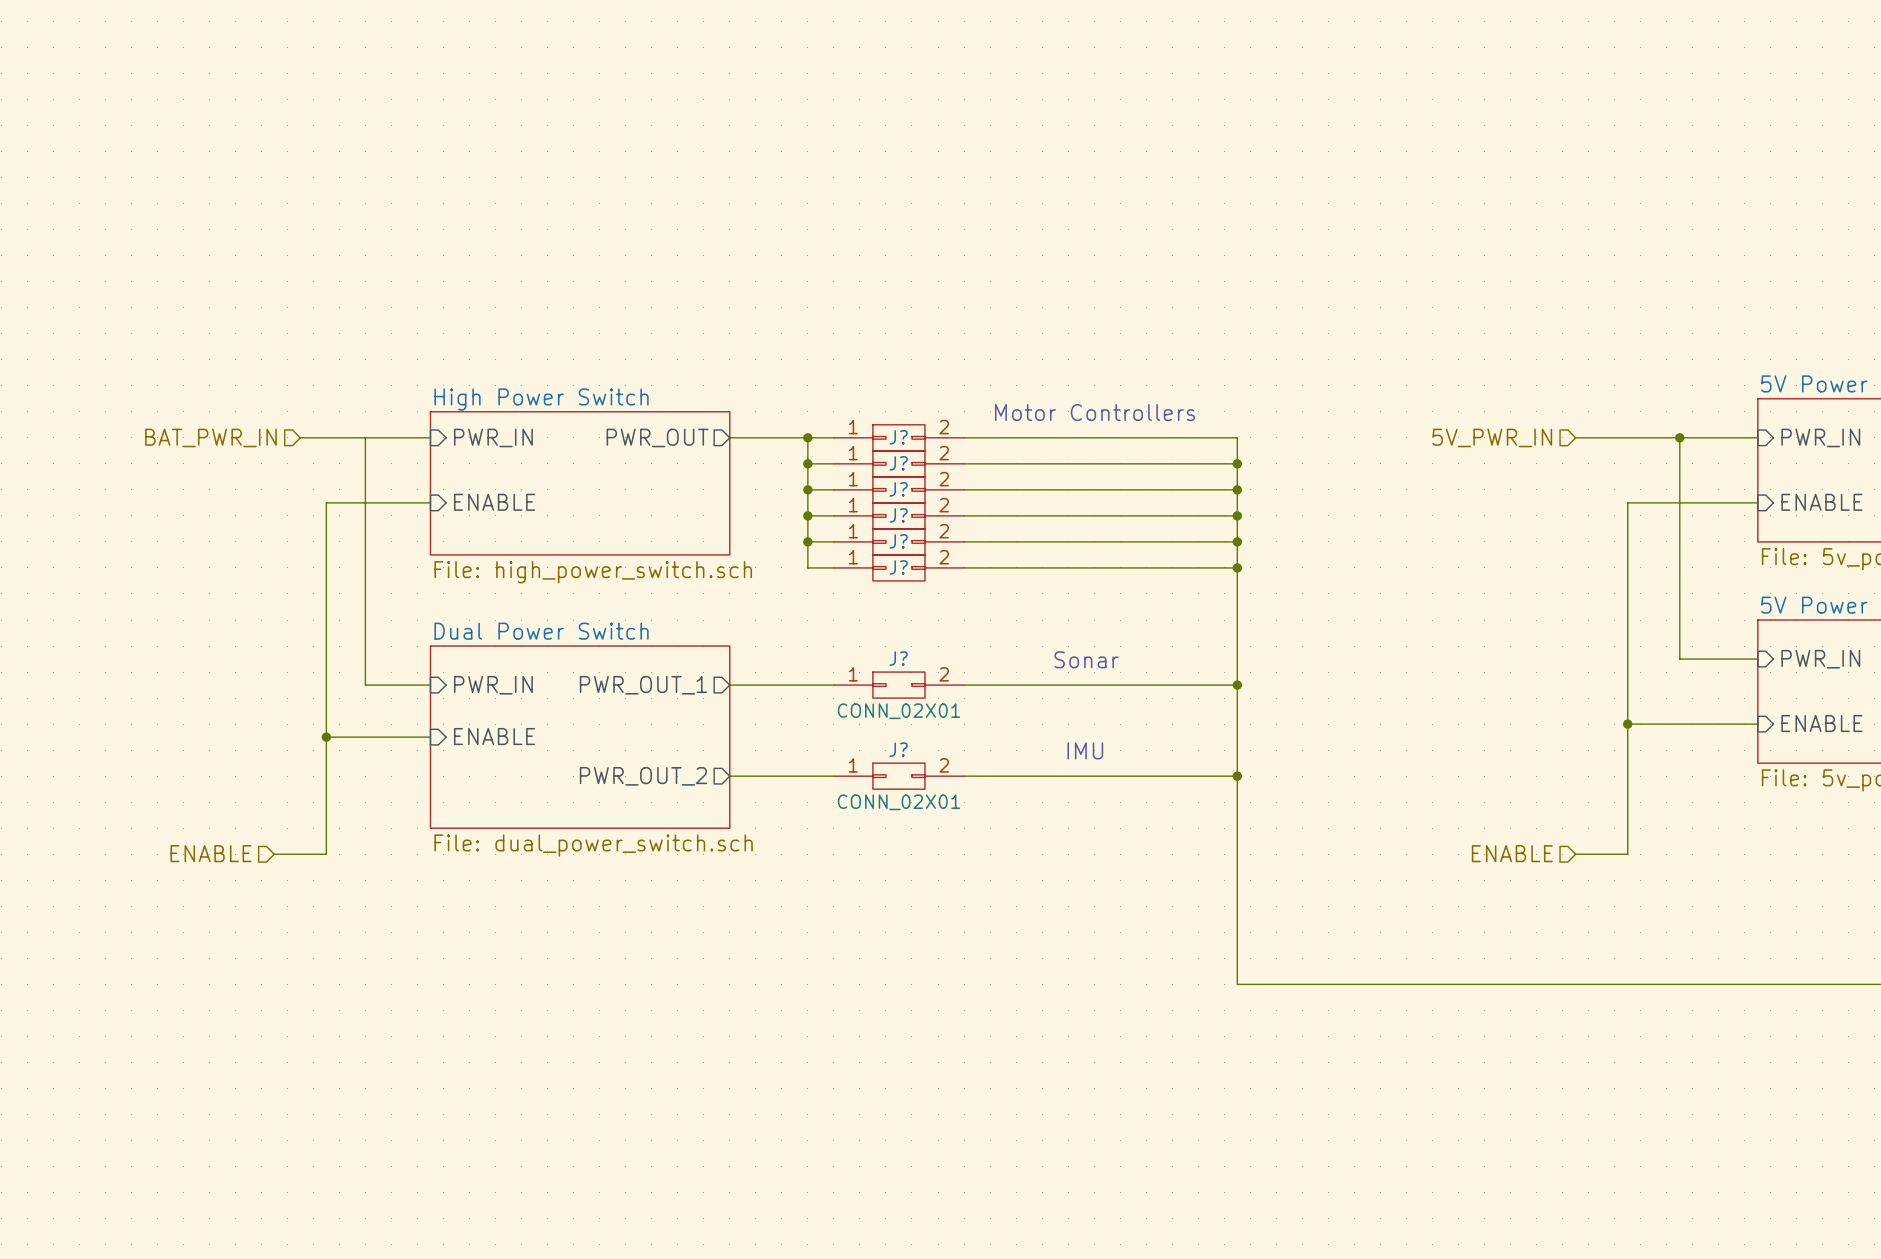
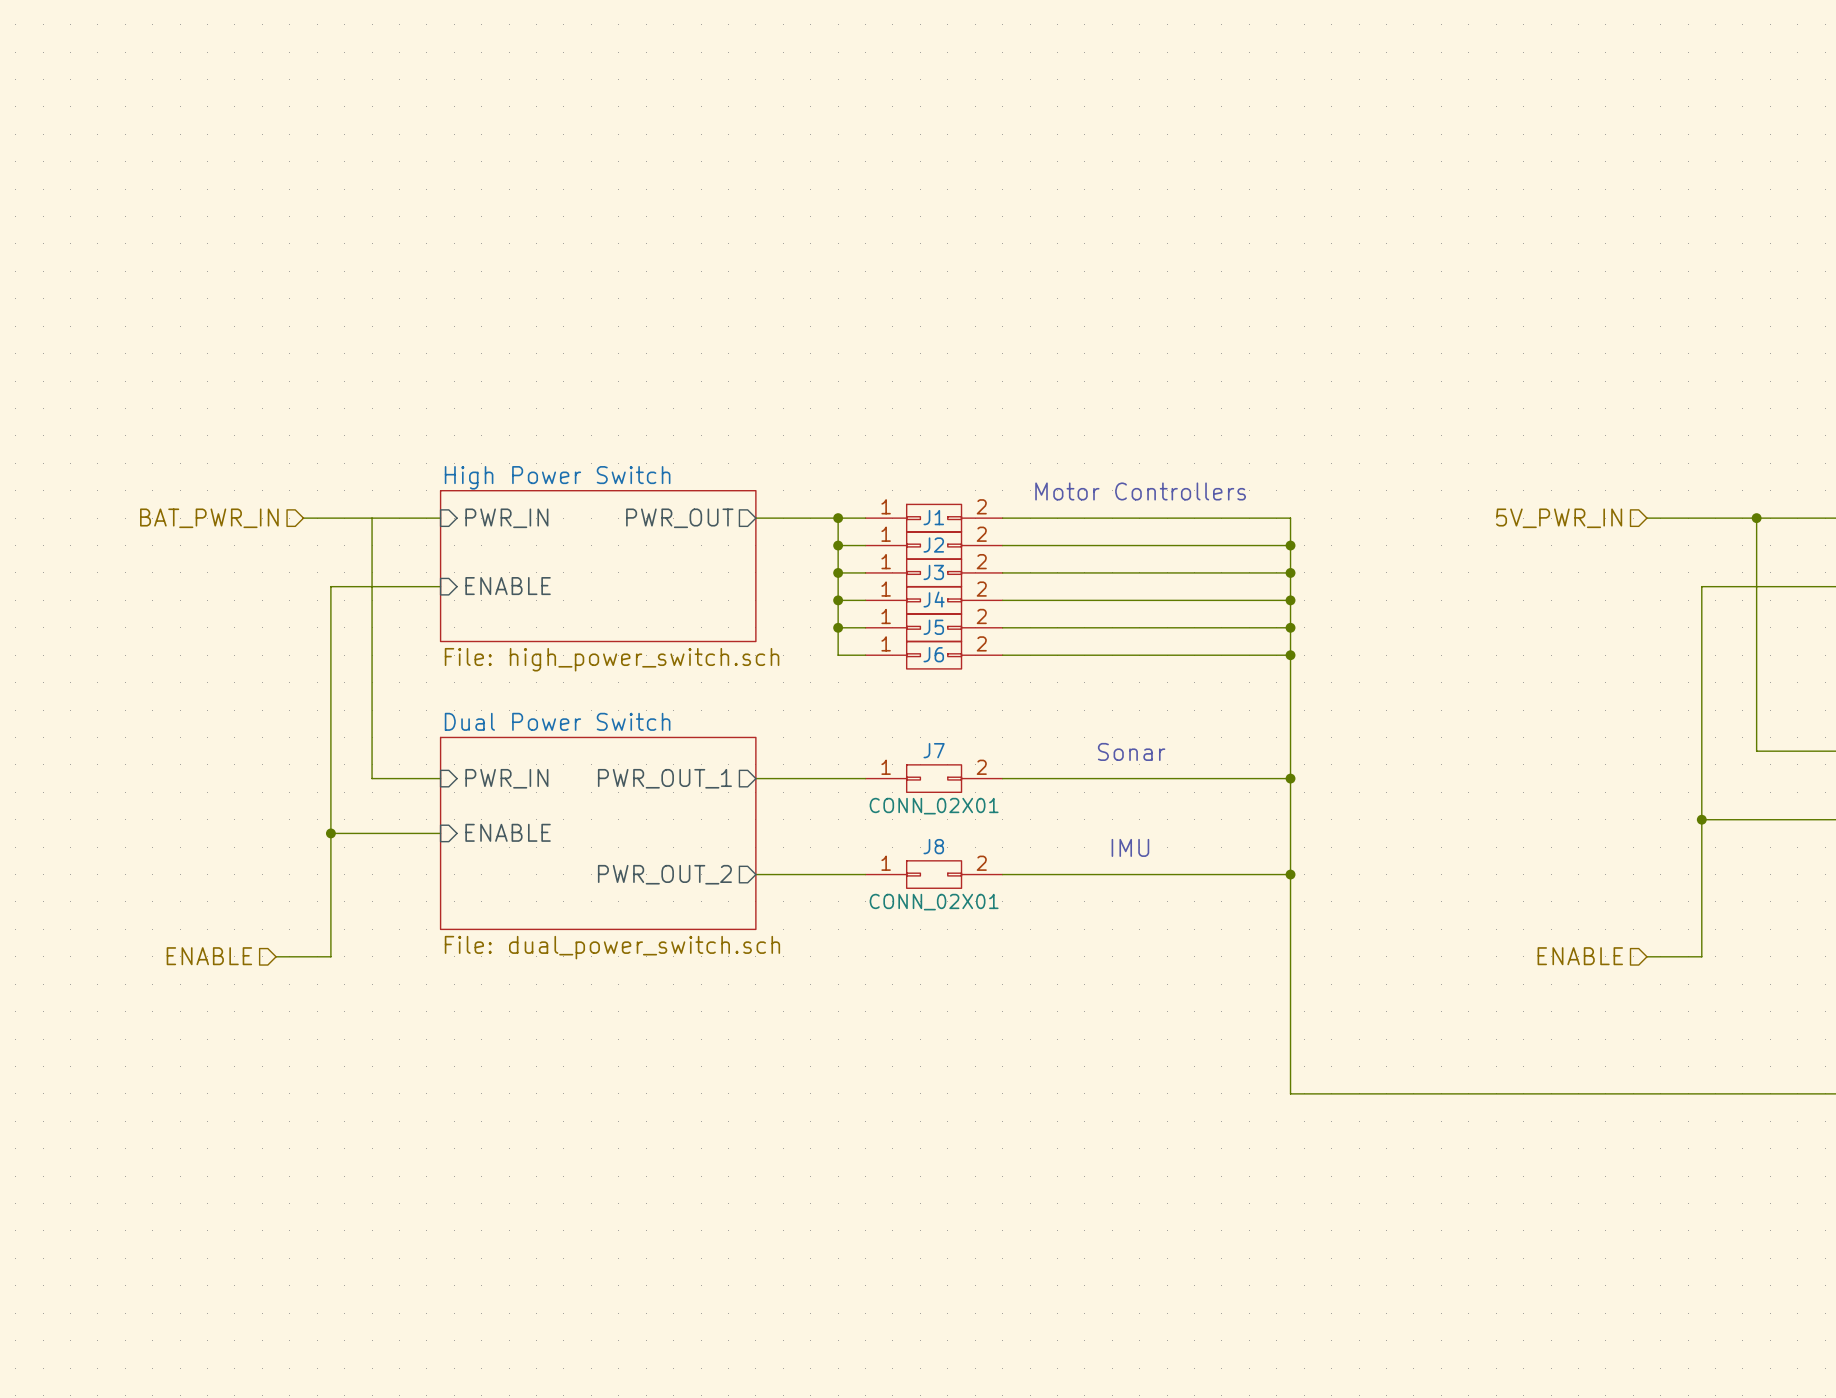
J? name: J? (898, 437) -> J1 (933, 517)
J? name: J? (898, 463) -> J2 (933, 545)
J? name: J? (898, 489) -> J3 (933, 572)
J? name: J? (898, 515) -> J4 (934, 599)
J? name: J? (898, 541) -> J5 (933, 627)
J? name: J? (898, 567) -> J6 (933, 654)
J? name: J? (898, 658) -> J7 (934, 750)
J? name: J? (898, 749) -> J8 (933, 846)

